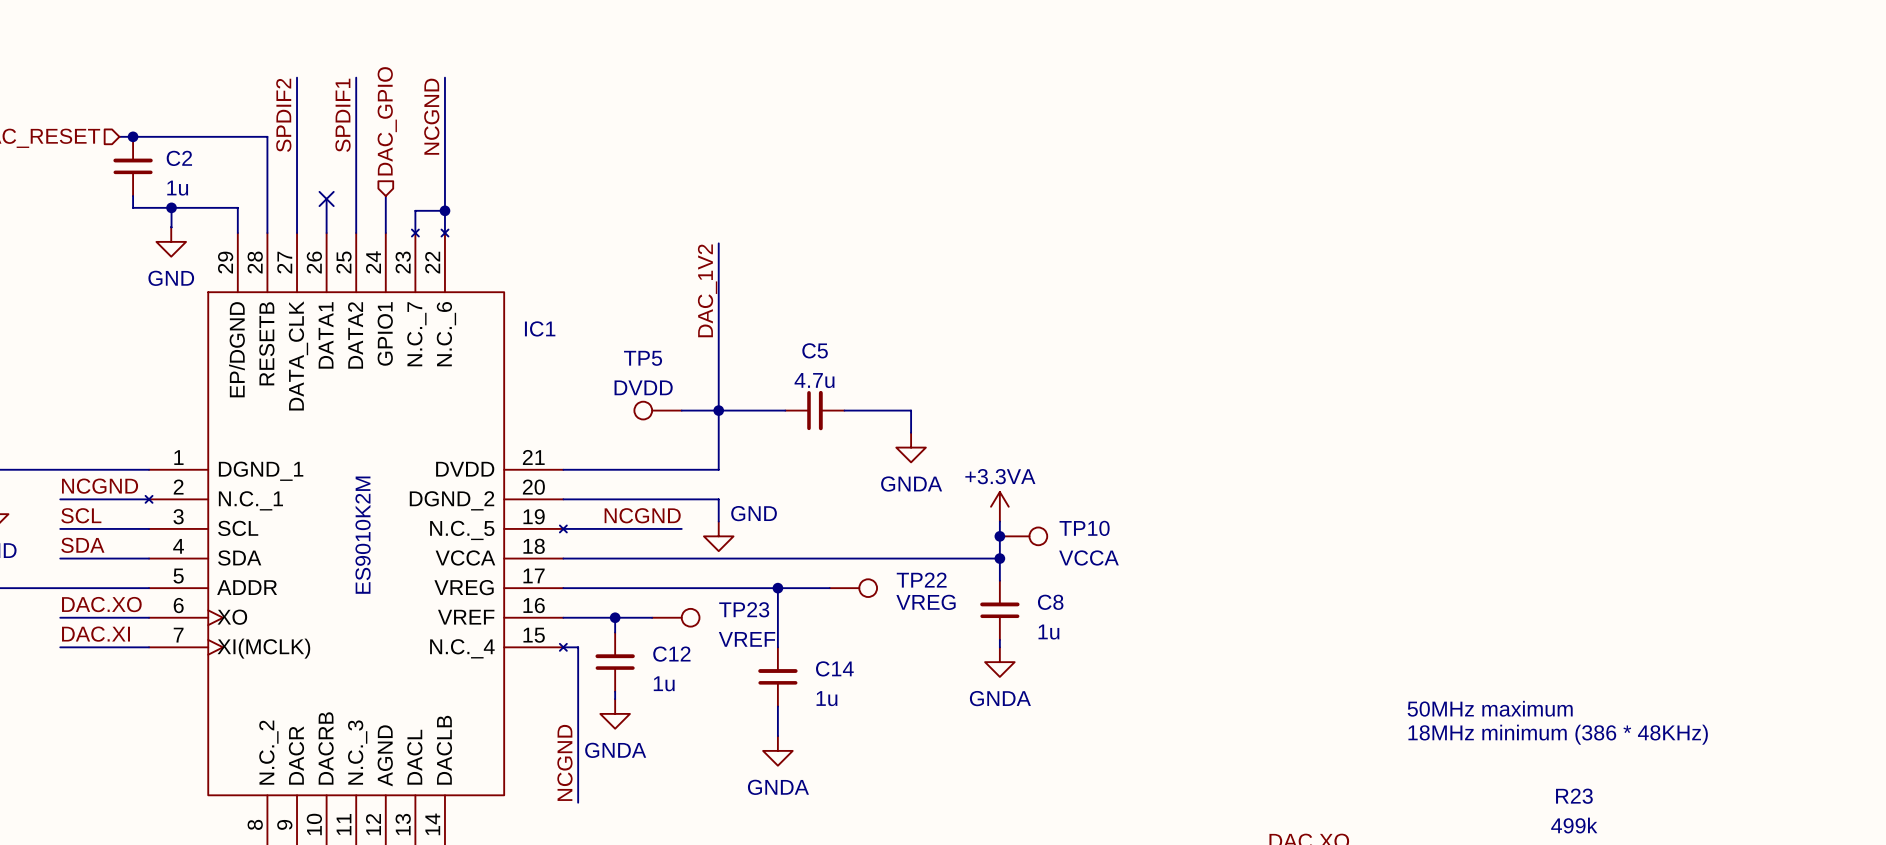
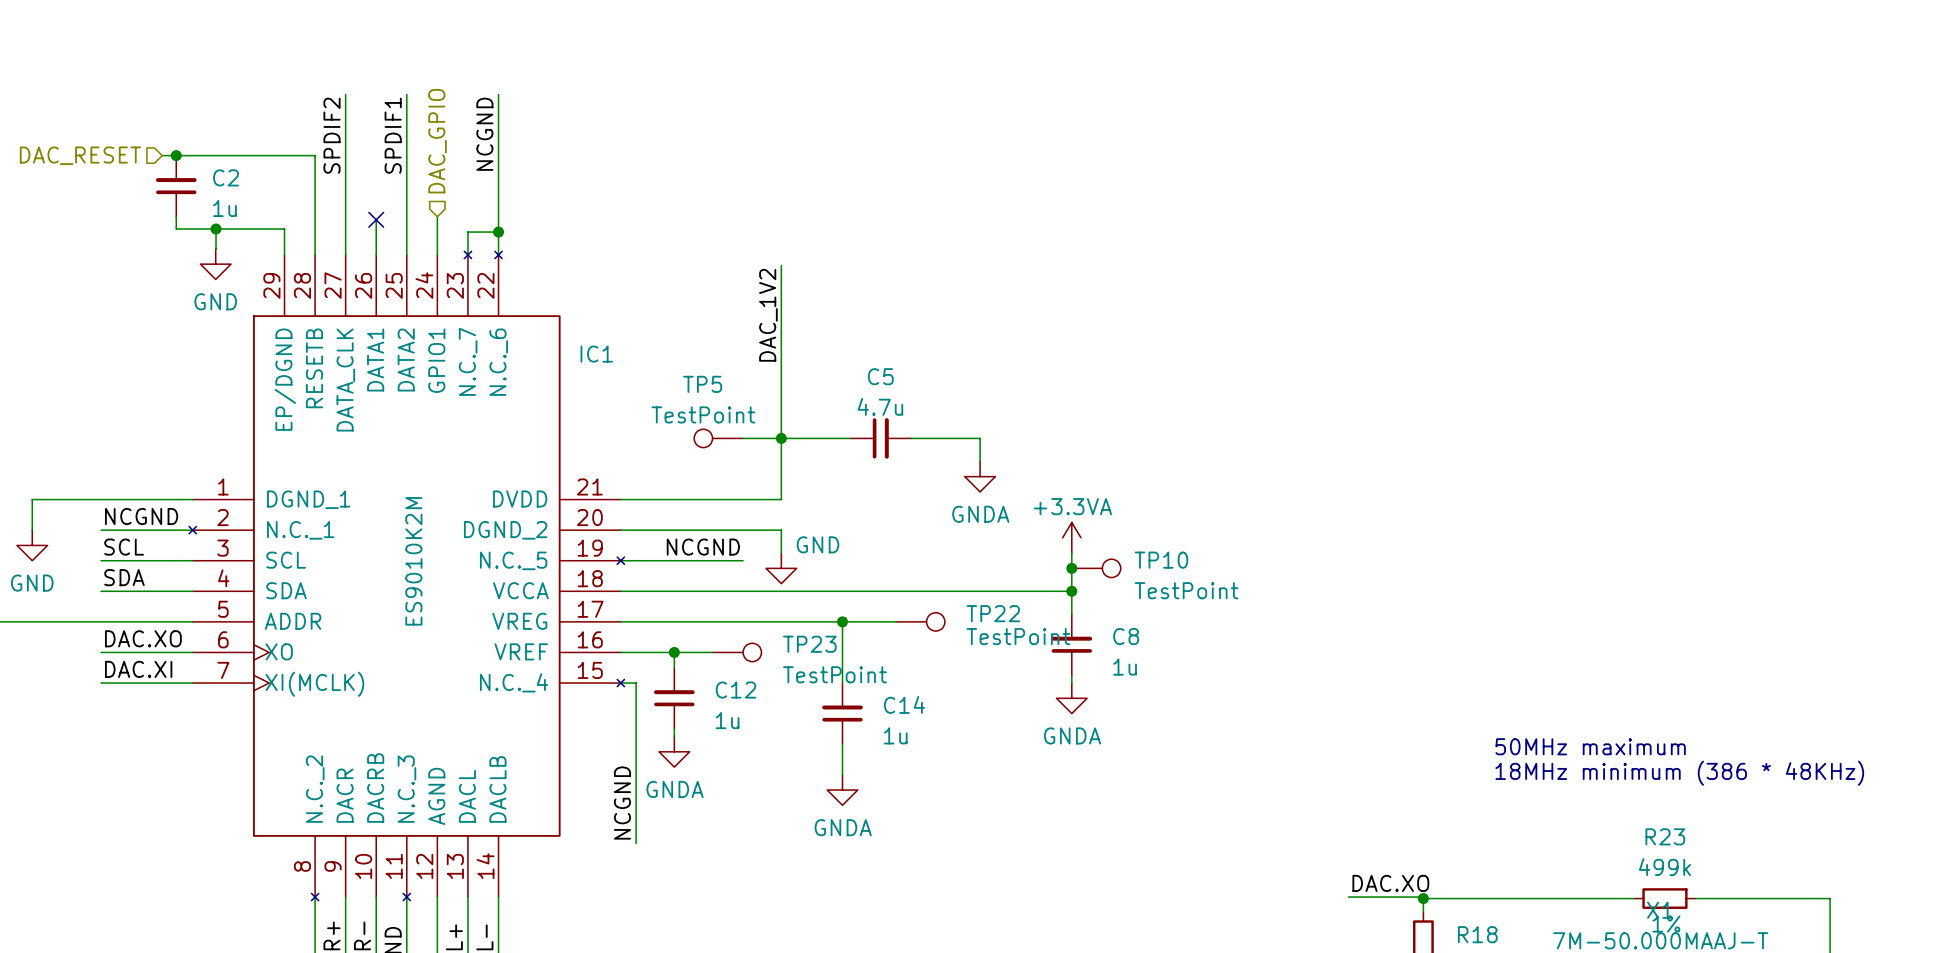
TP5 value: DVDD (643, 387) -> TestPoint (703, 414)
TP10 value: VCCA (1088, 557) -> TestPoint (1186, 590)
TP22 value: VREG (926, 602) -> TestPoint (1018, 636)
TP23 value: VREF (747, 639) -> TestPoint (834, 674)

